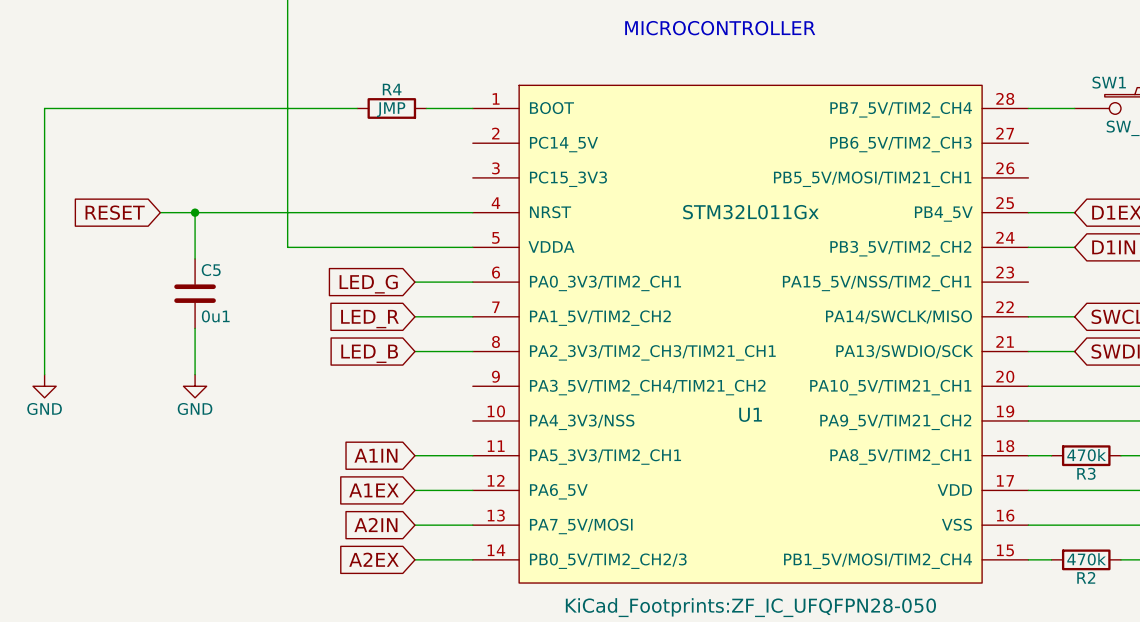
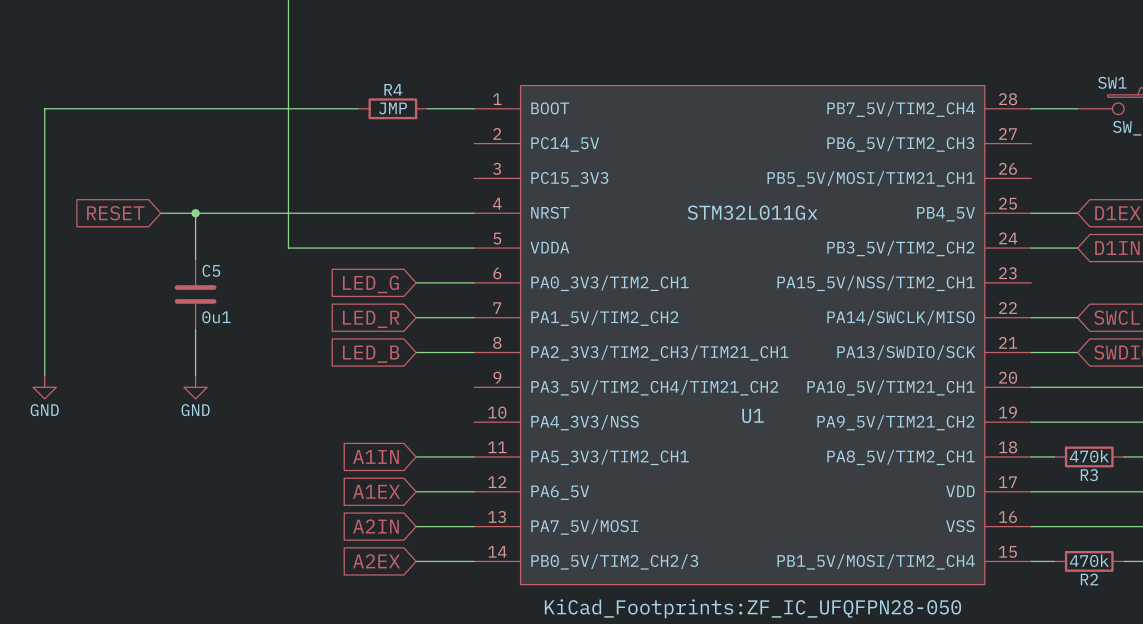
text: MICROCONTROLLER (720, 28) -> none

